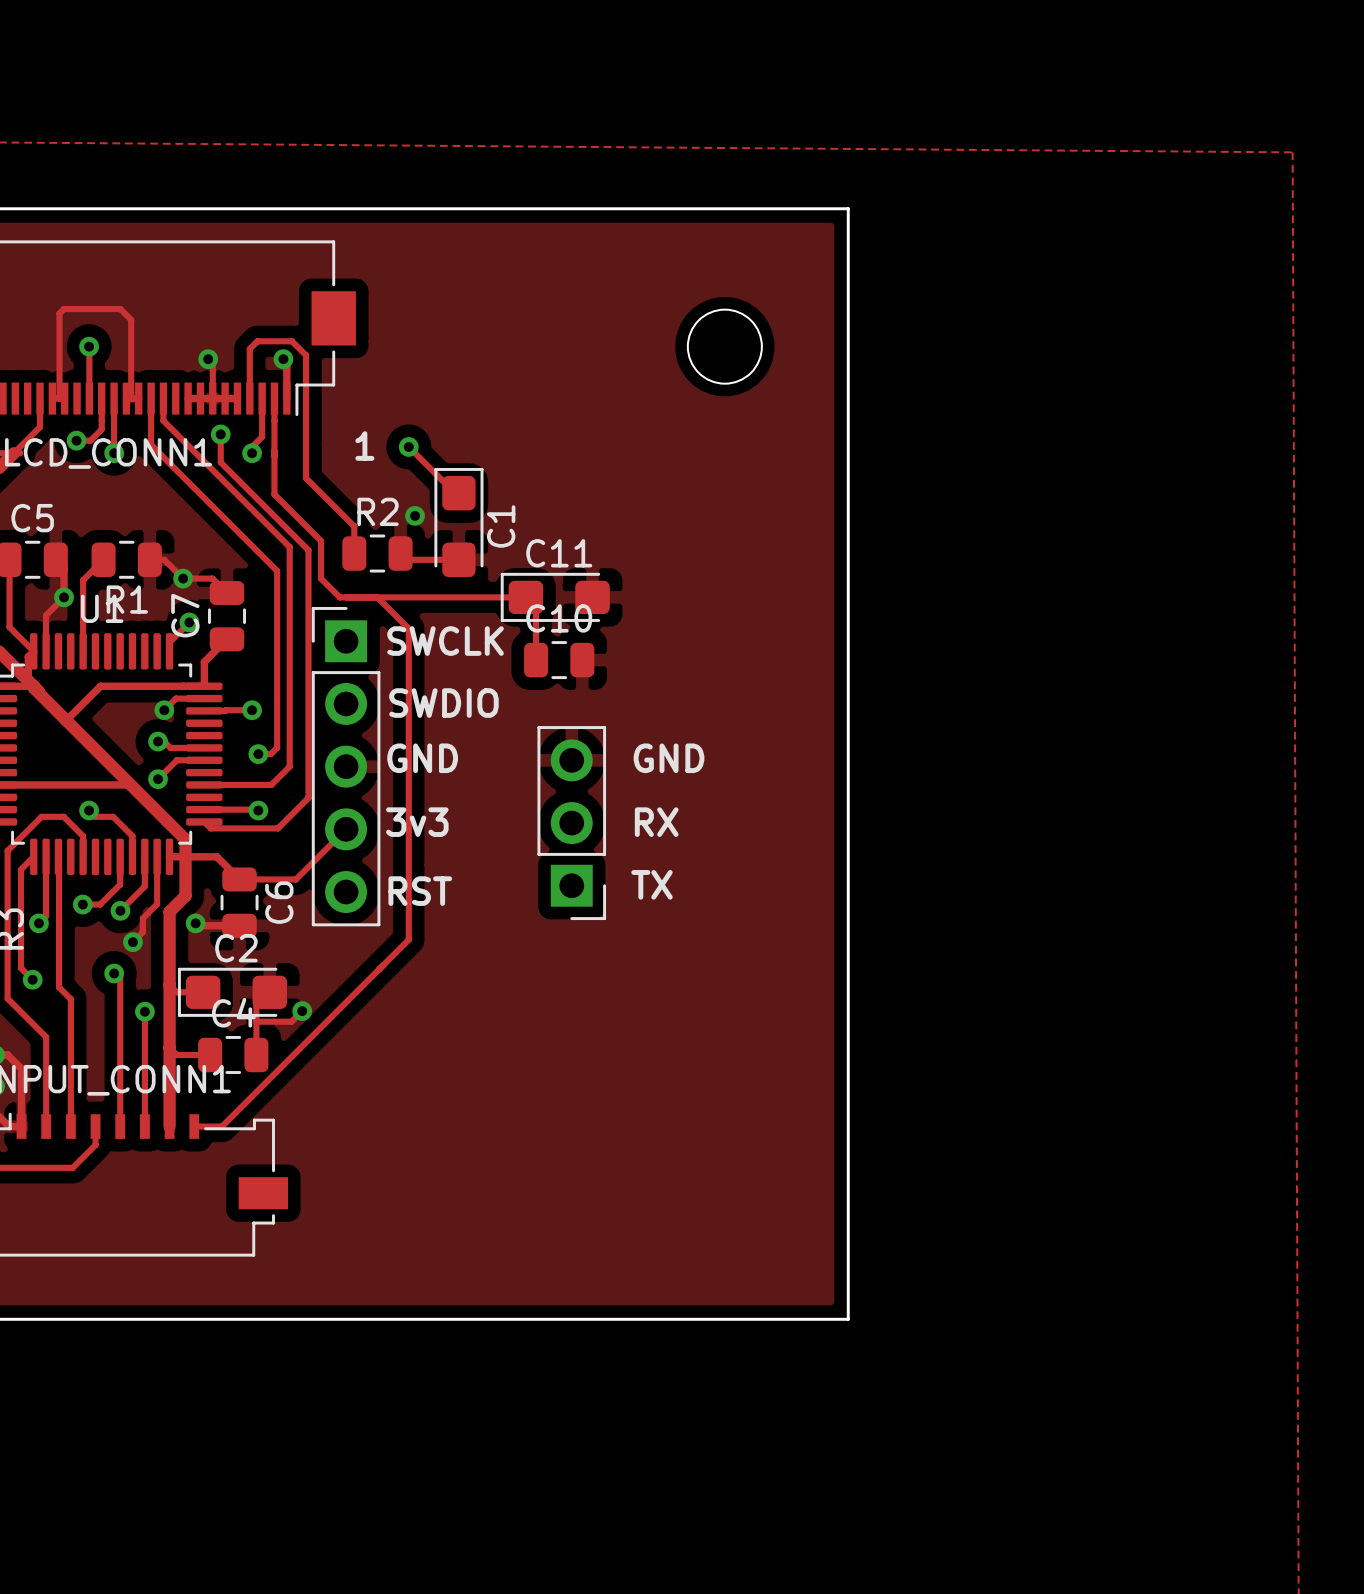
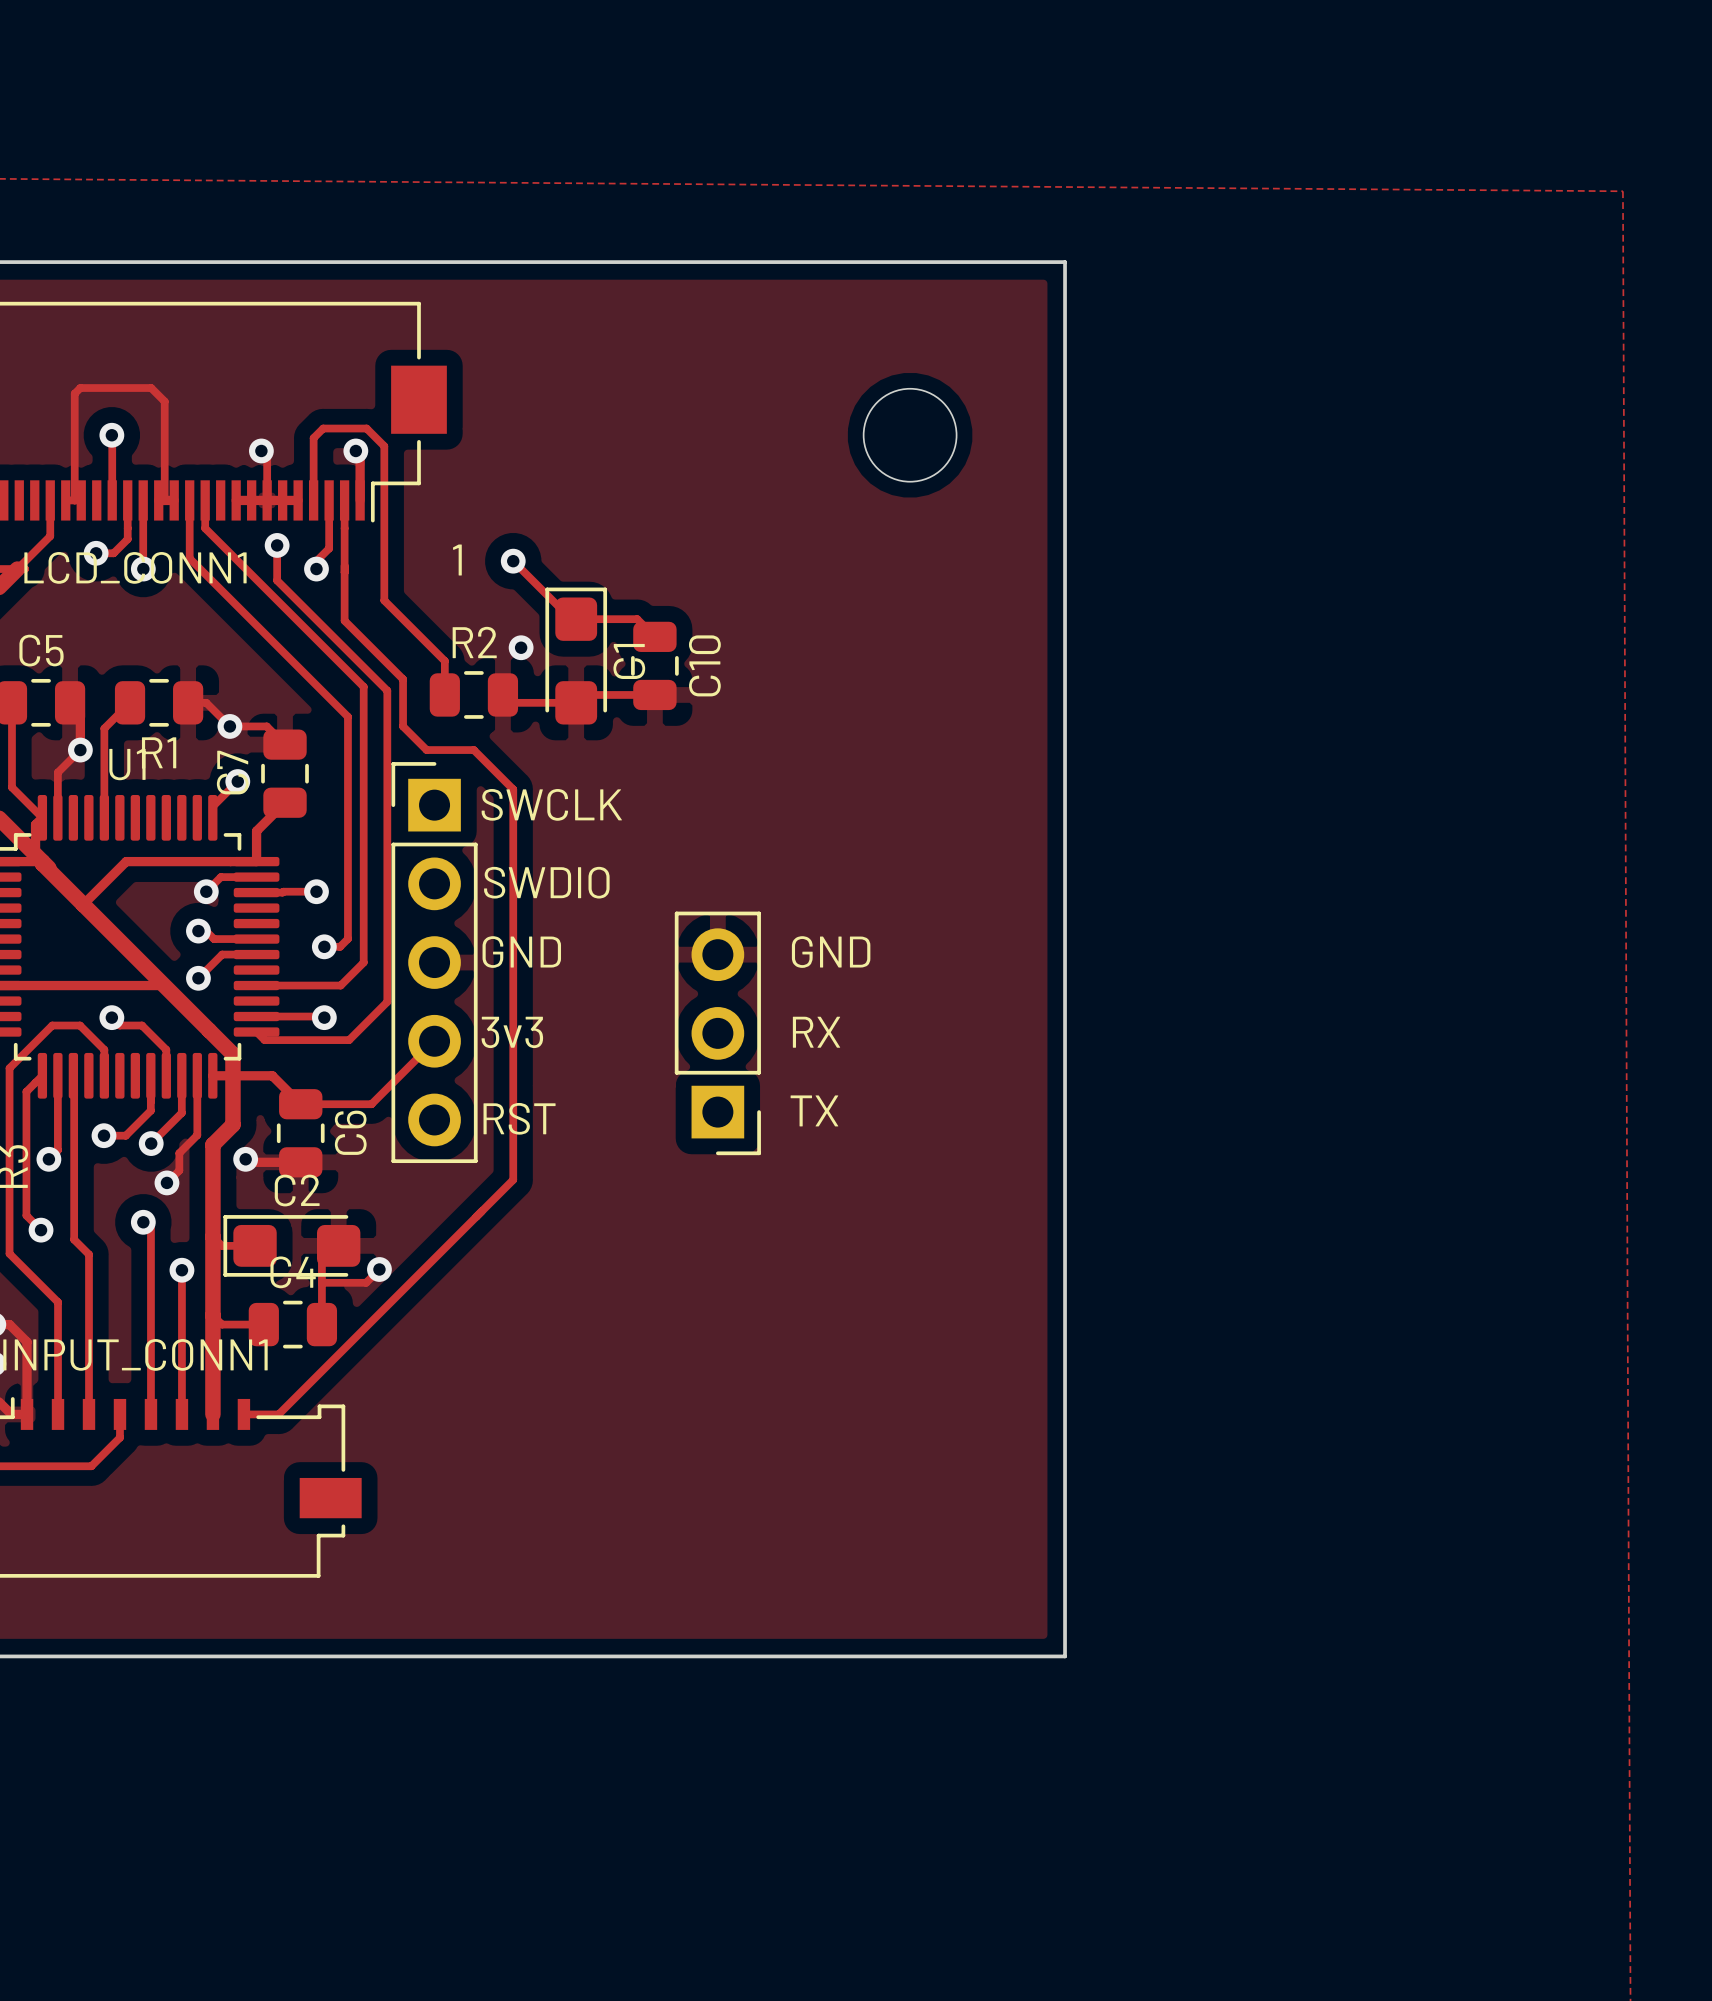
track: none -> (576, 619) (637, 619) (654, 636)
track: none -> (584, 694) (654, 694)
track: (377, 597) (525, 597) (536, 607) (536, 660) -> none
C11: (555, 597) -> none
C10 rotation: 0° (559, 660) -> 90° clockwise (654, 665)
C10 position: (559, 660) -> (654, 665)

